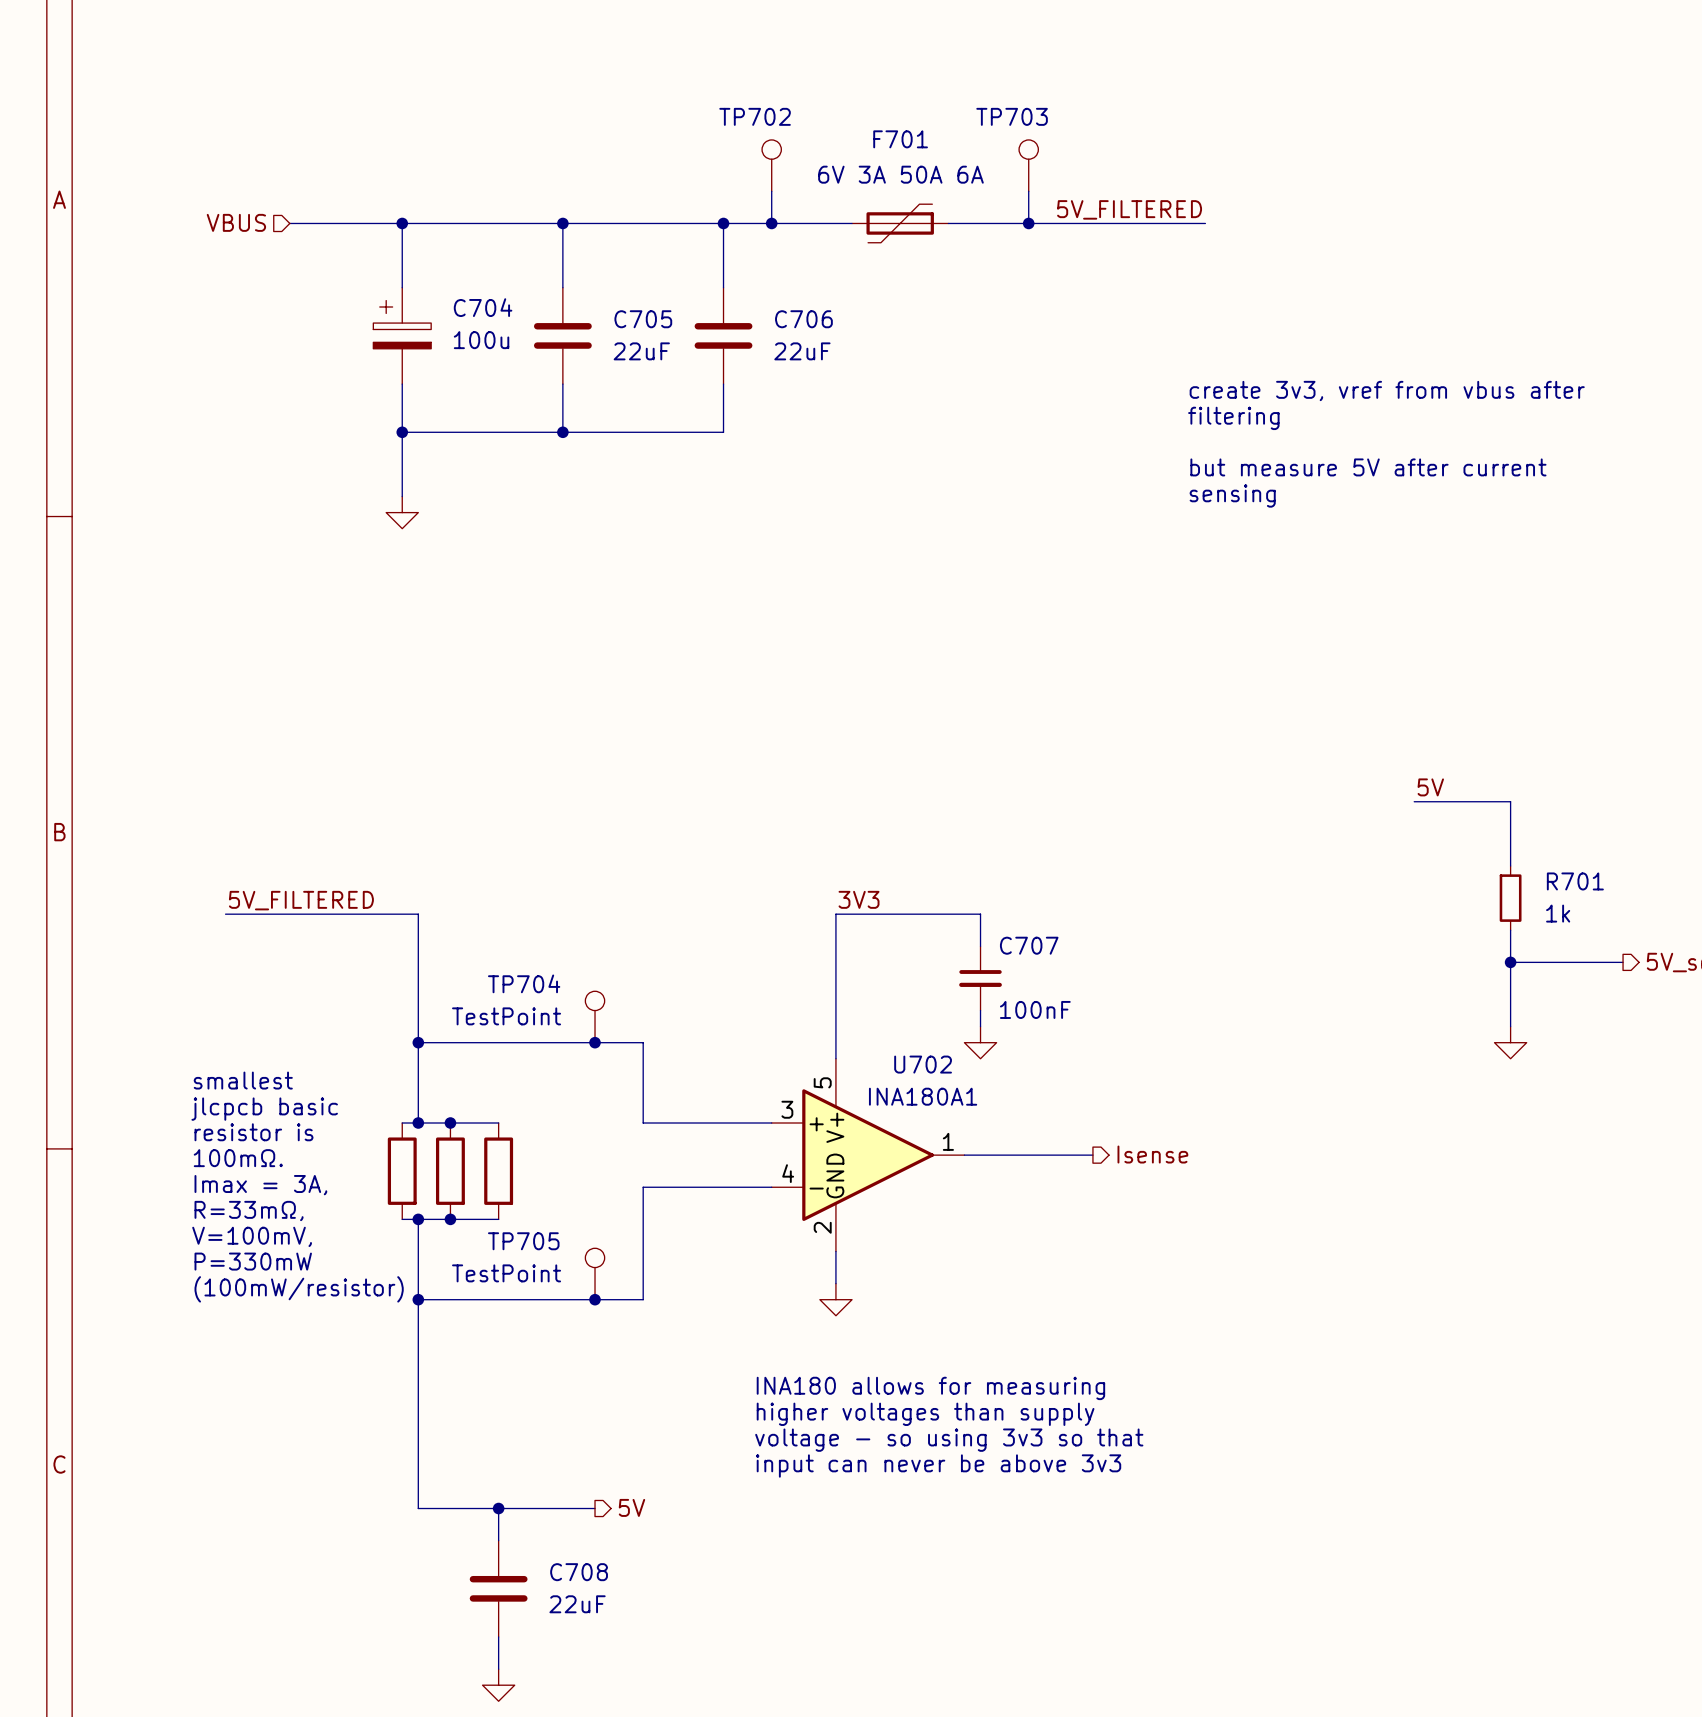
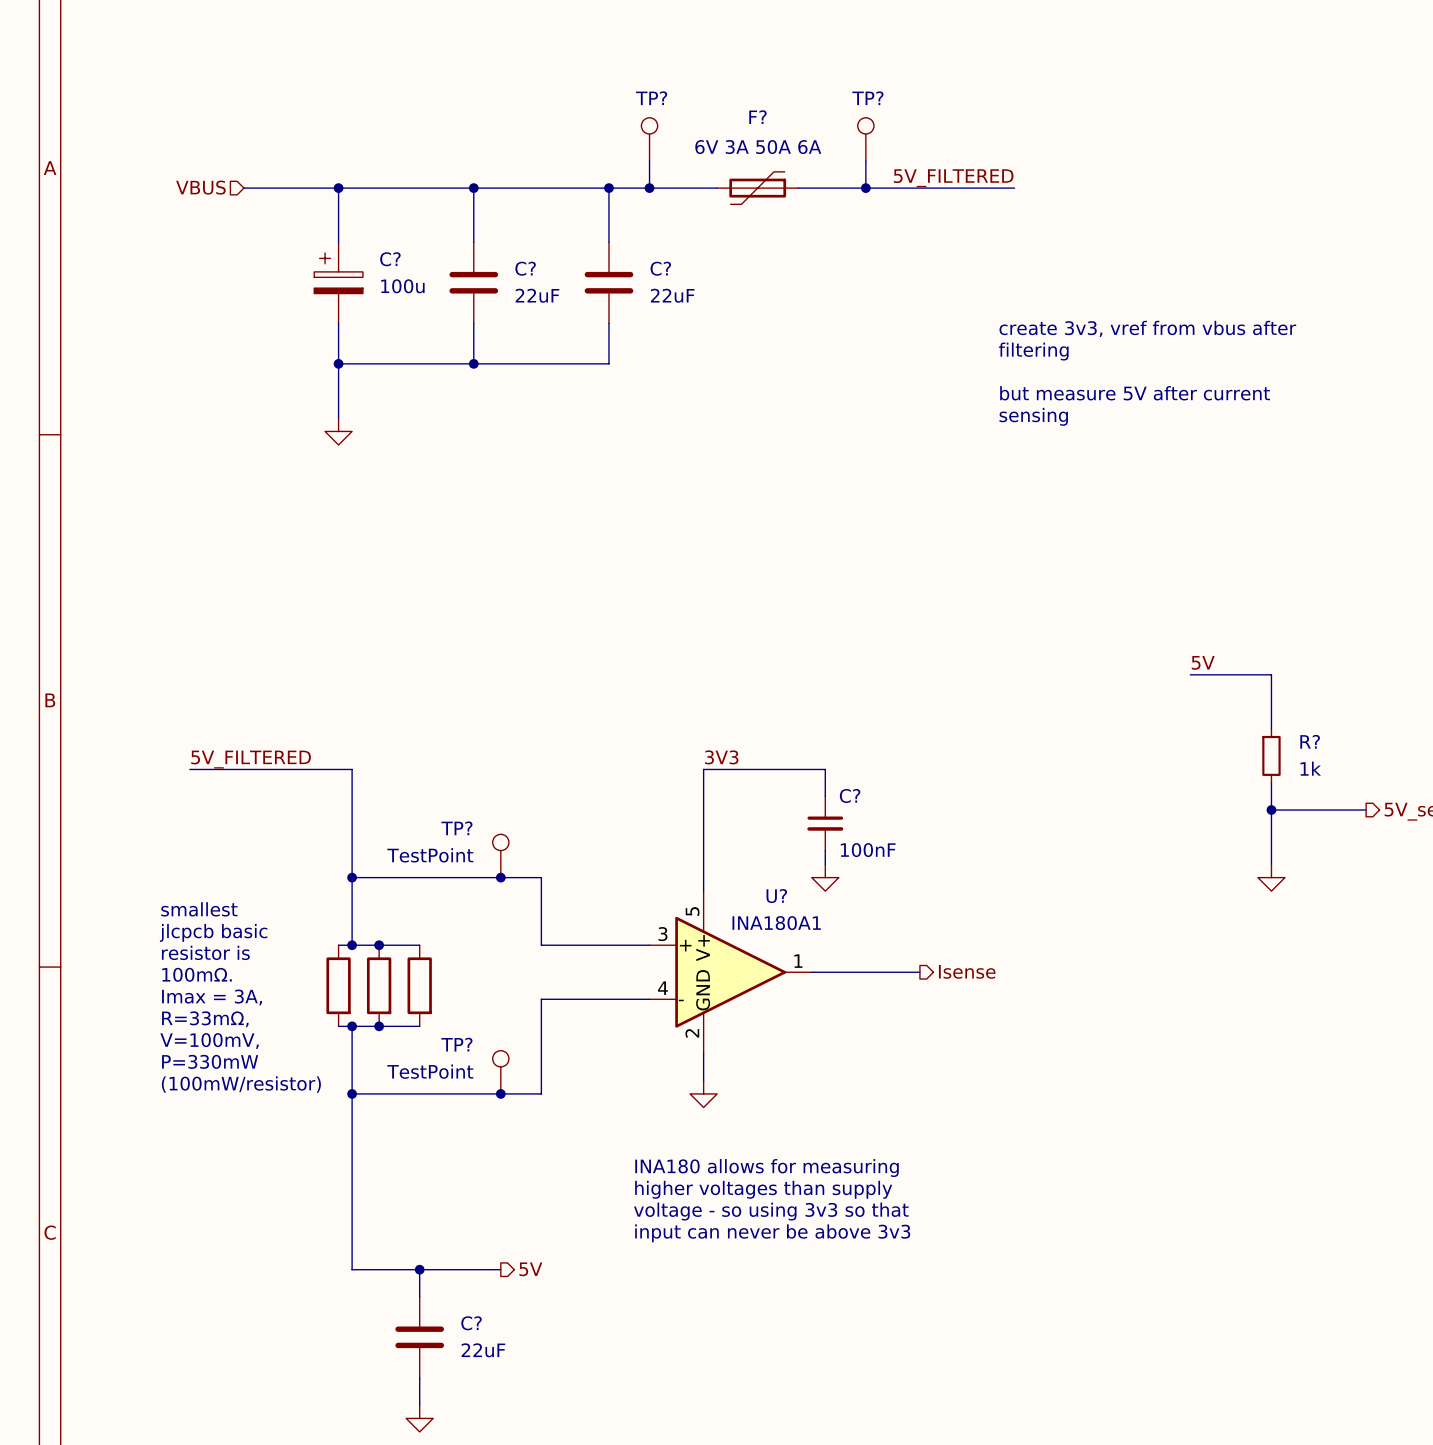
TP702 name: TP702 (755, 116) -> TP? (651, 98)
TP703 name: TP703 (1012, 116) -> TP? (867, 98)
F701 name: F701 (900, 139) -> F? (757, 117)
C704 name: C704 (483, 307) -> C? (390, 259)
C705 name: C705 (643, 319) -> C? (525, 268)
C706 name: C706 (803, 319) -> C? (660, 268)
R701 name: R701 (1575, 881) -> R? (1310, 741)
C707 name: C707 (1029, 945) -> C? (850, 796)
TP704 name: TP704 (524, 983) -> TP? (456, 828)
U702 name: U702 (923, 1064) -> U? (776, 896)
TP705 name: TP705 (523, 1241) -> TP? (456, 1044)
C708 name: C708 (579, 1572) -> C? (471, 1323)

